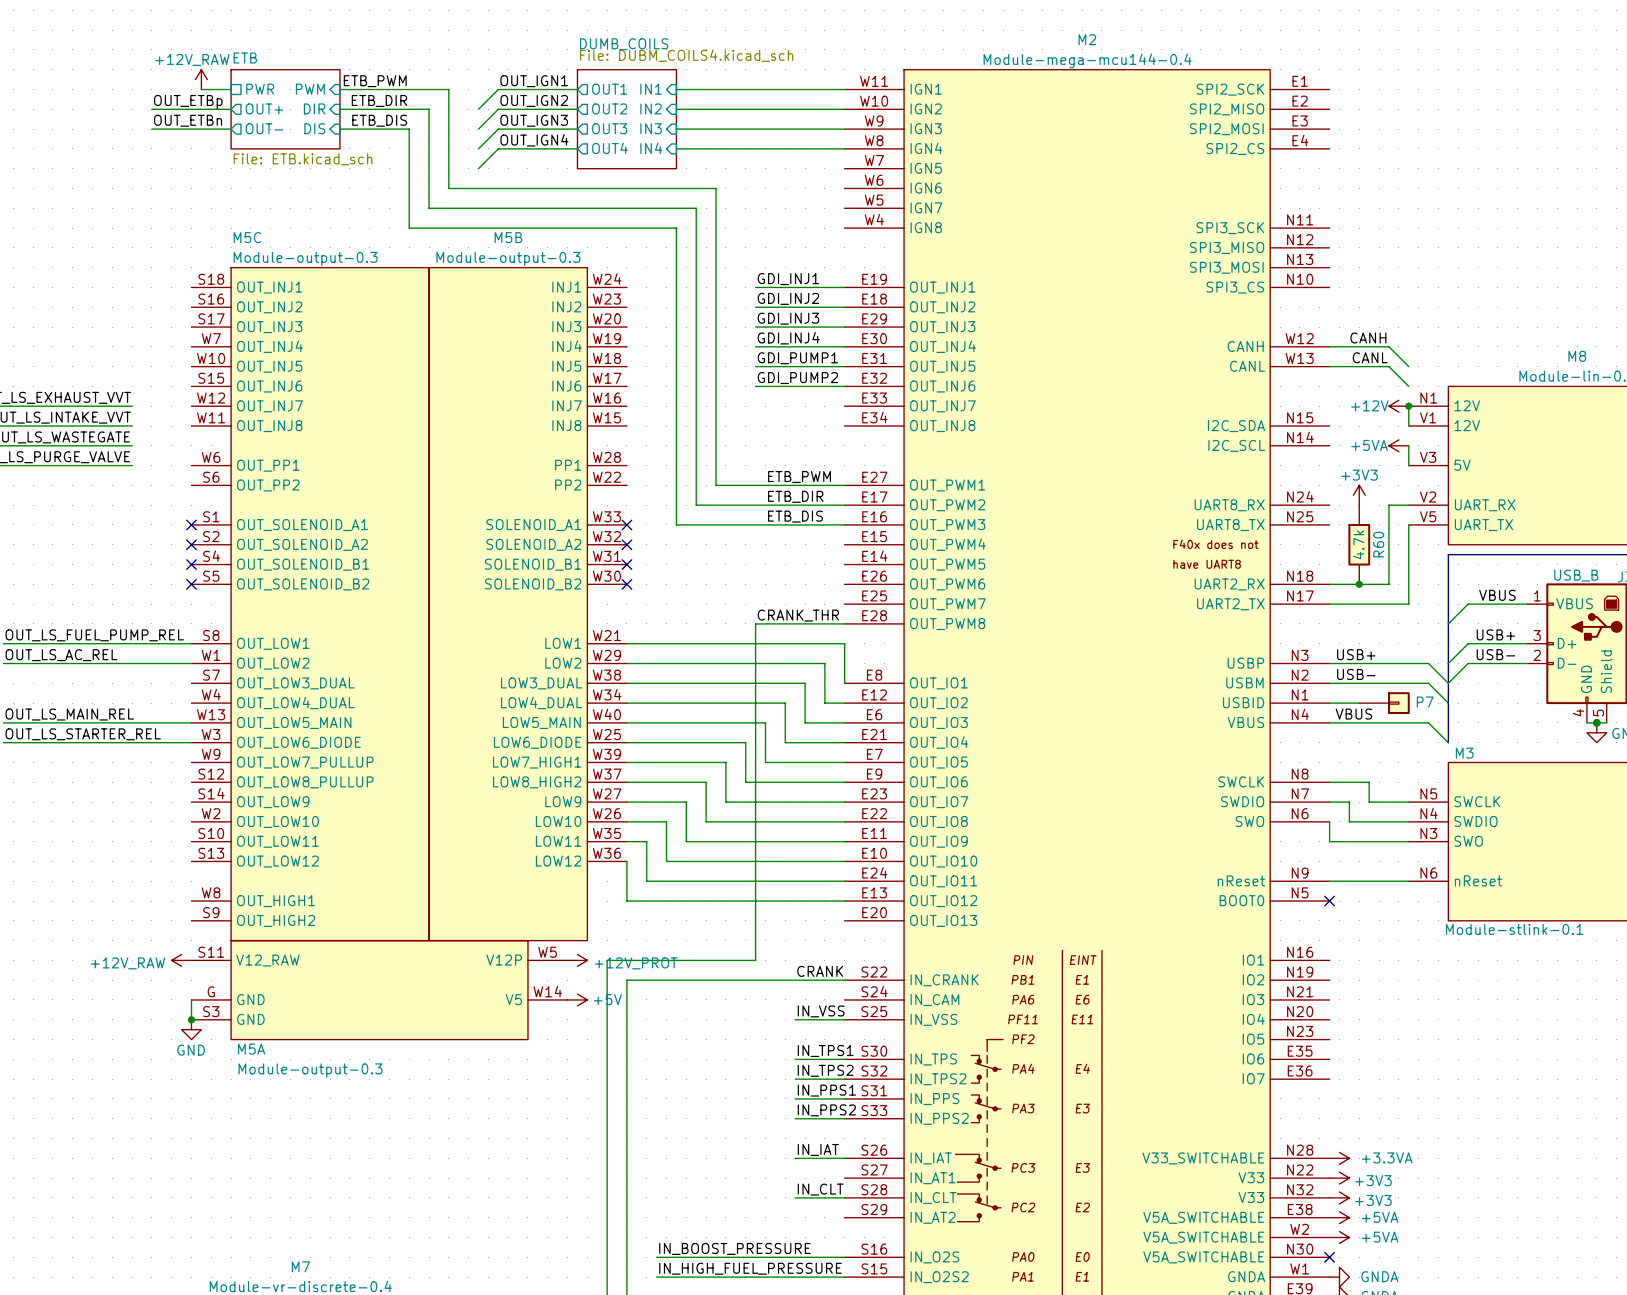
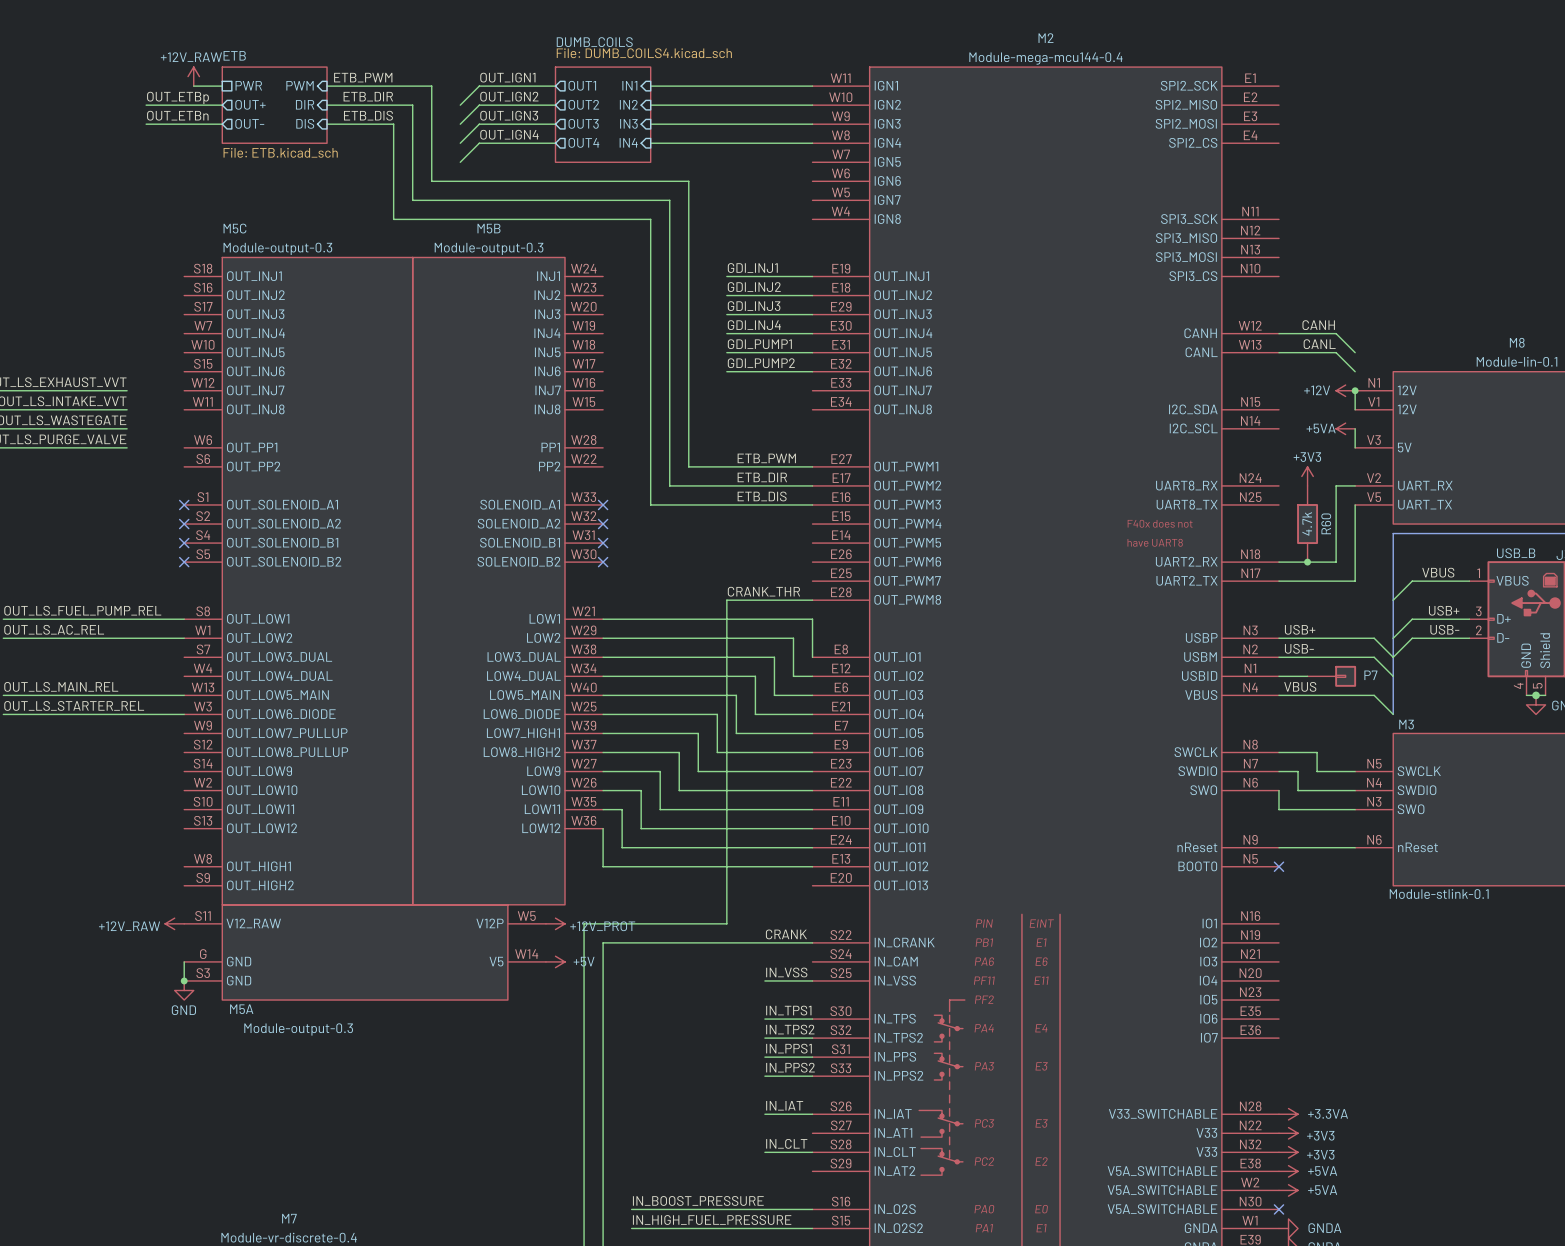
sheet DUMB_COILS value: File: DUBM_COILS4.kicad_sch (686, 55) -> File: DUMB_COILS4.kicad_sch (644, 53)

